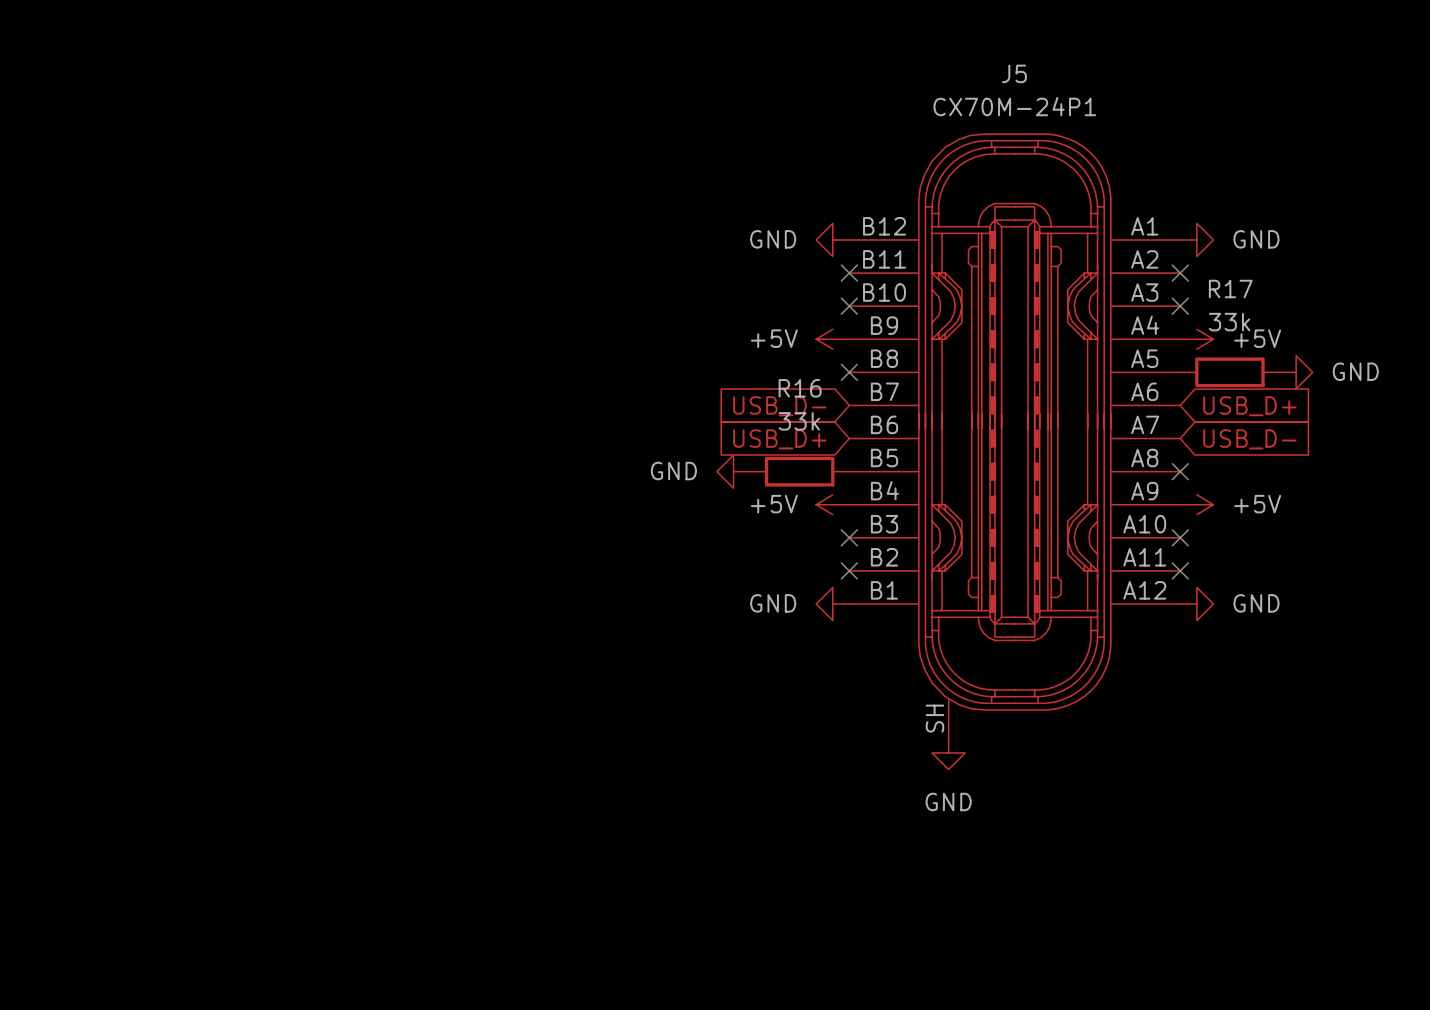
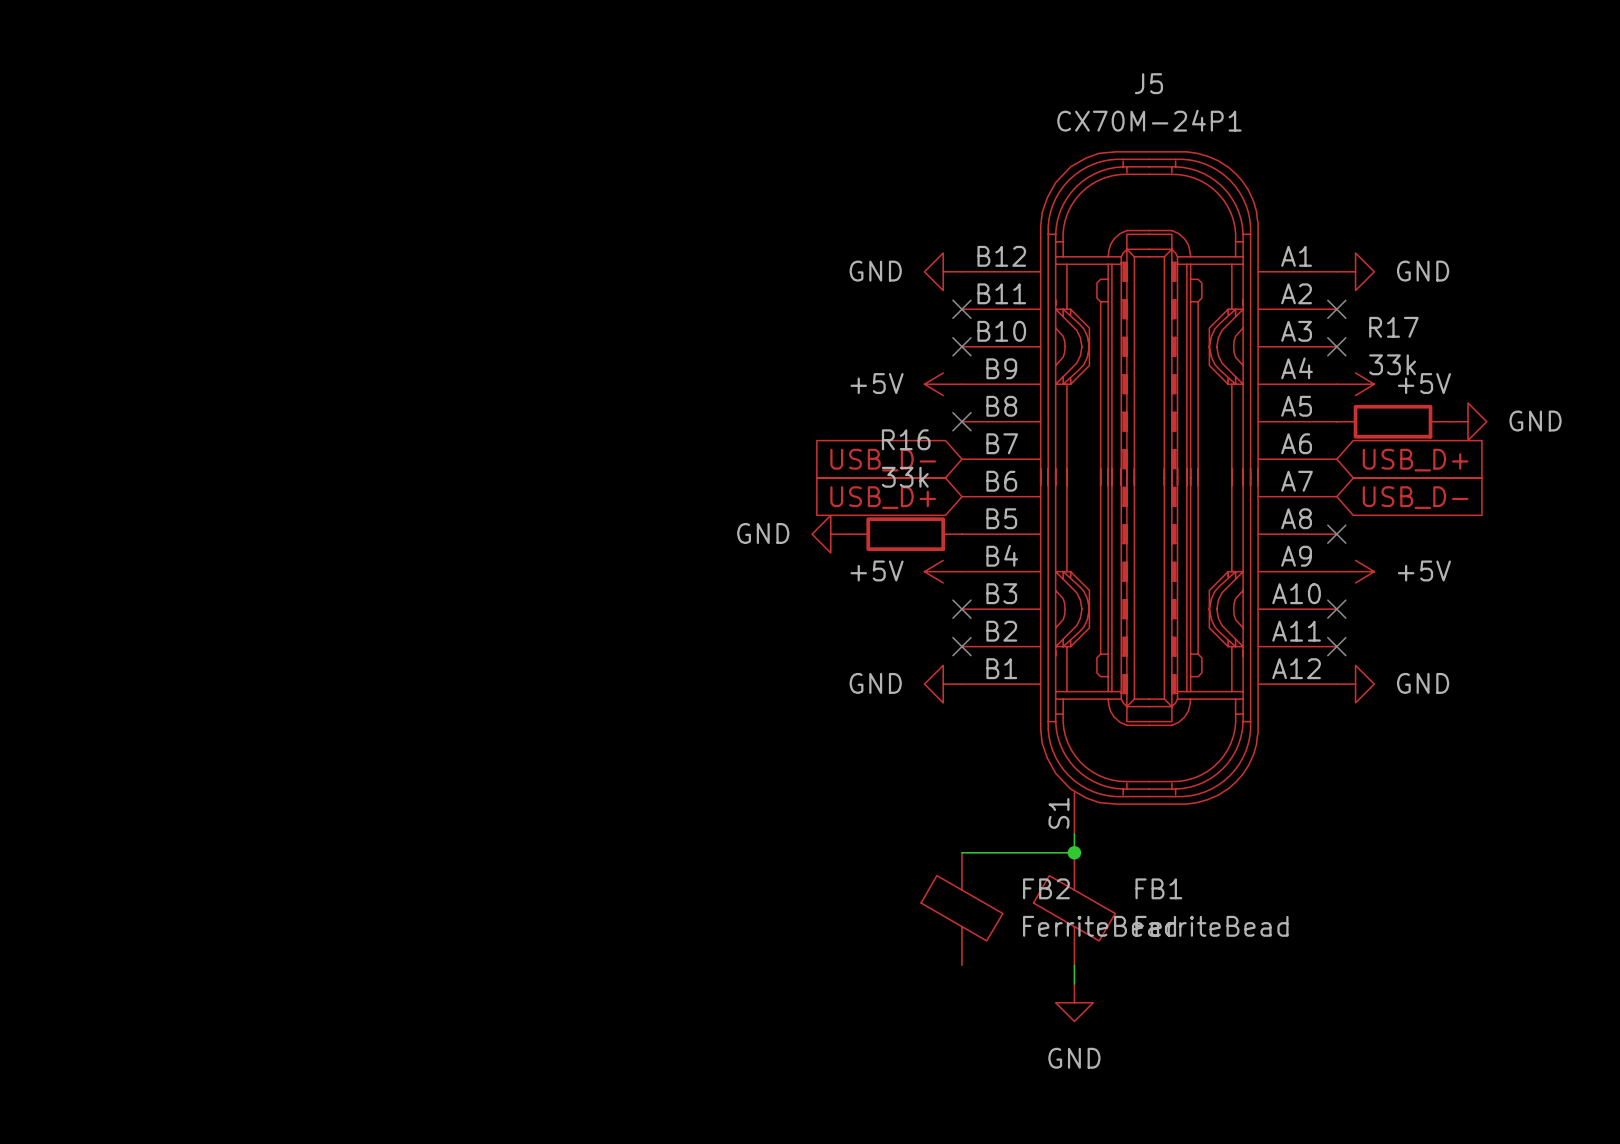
J5 pin number: SH (934, 718) -> S1 (1058, 813)
wire: none -> (1074, 834) (1074, 852) (961, 852)
power symbol position: GND (948, 752) -> GND (1074, 1002)
junction: none -> (1074, 852)
FB2: none -> FerriteBead (961, 909)
FB1: none -> FerriteBead (1074, 909)
wire: none -> (1074, 965) (1074, 984)

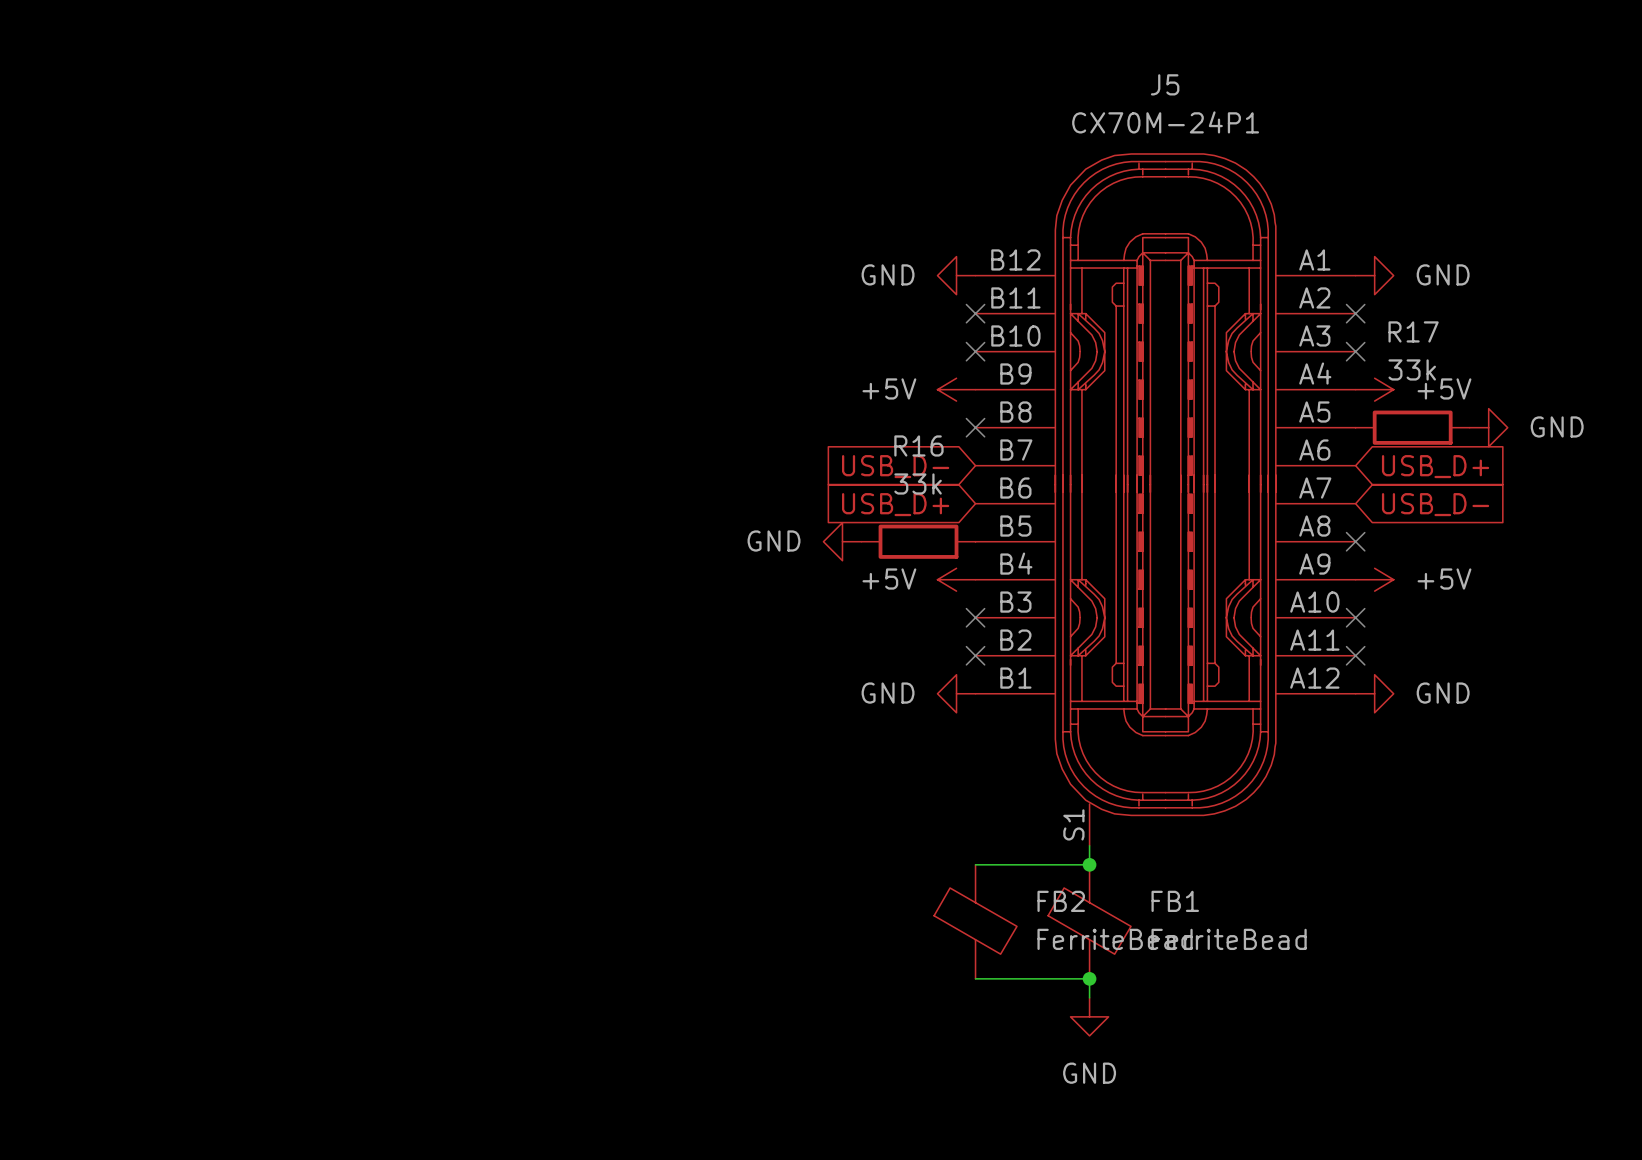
wire: none -> (975, 978) (1089, 978)
junction: none -> (1089, 978)

